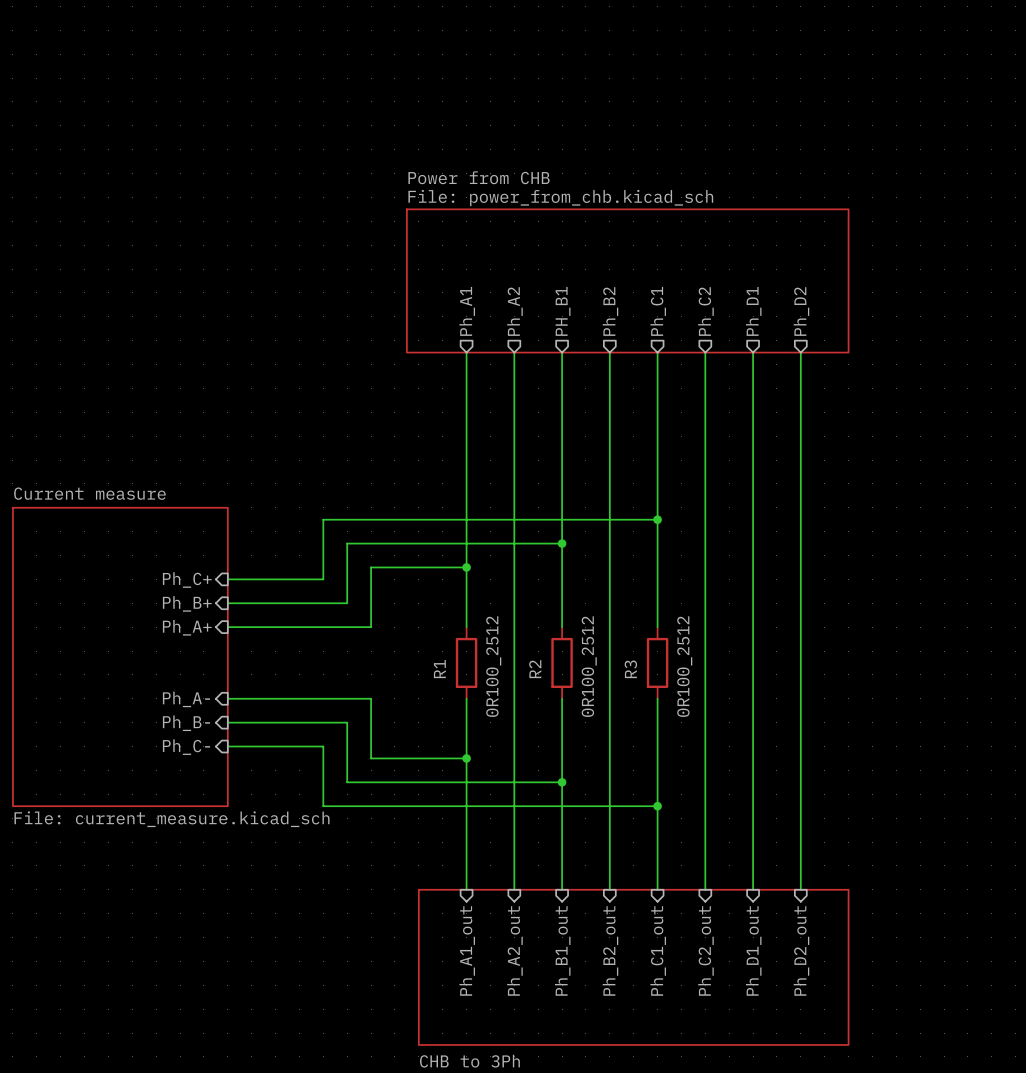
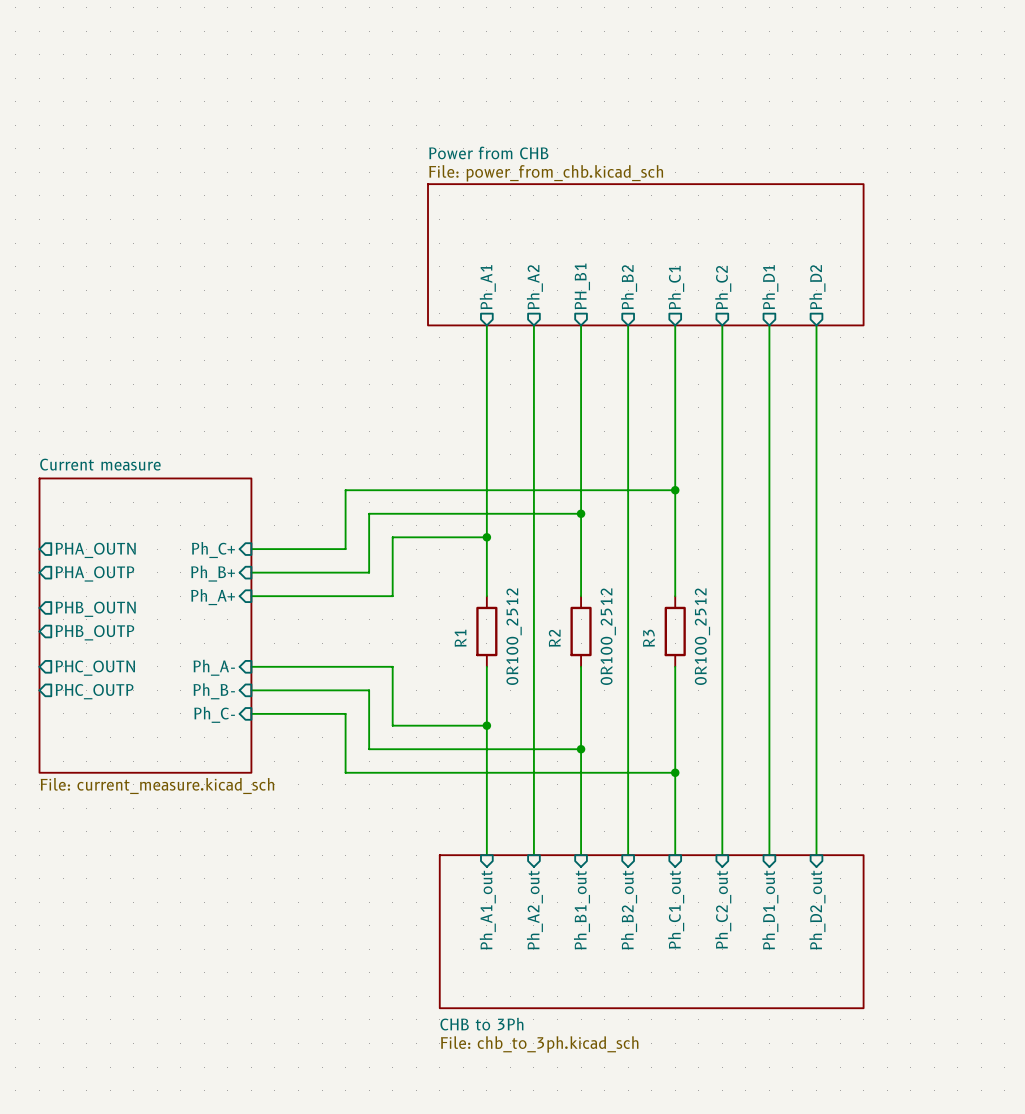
sheet pin: none -> PHA_OUTN (95, 550)
sheet pin: none -> PHA_OUTP (94, 573)
sheet pin: none -> PHB_OUTN (95, 609)
sheet pin: none -> PHB_OUTP (94, 632)
sheet pin: none -> PHC_OUTN (95, 668)
sheet pin: none -> PHC_OUTP (94, 691)

